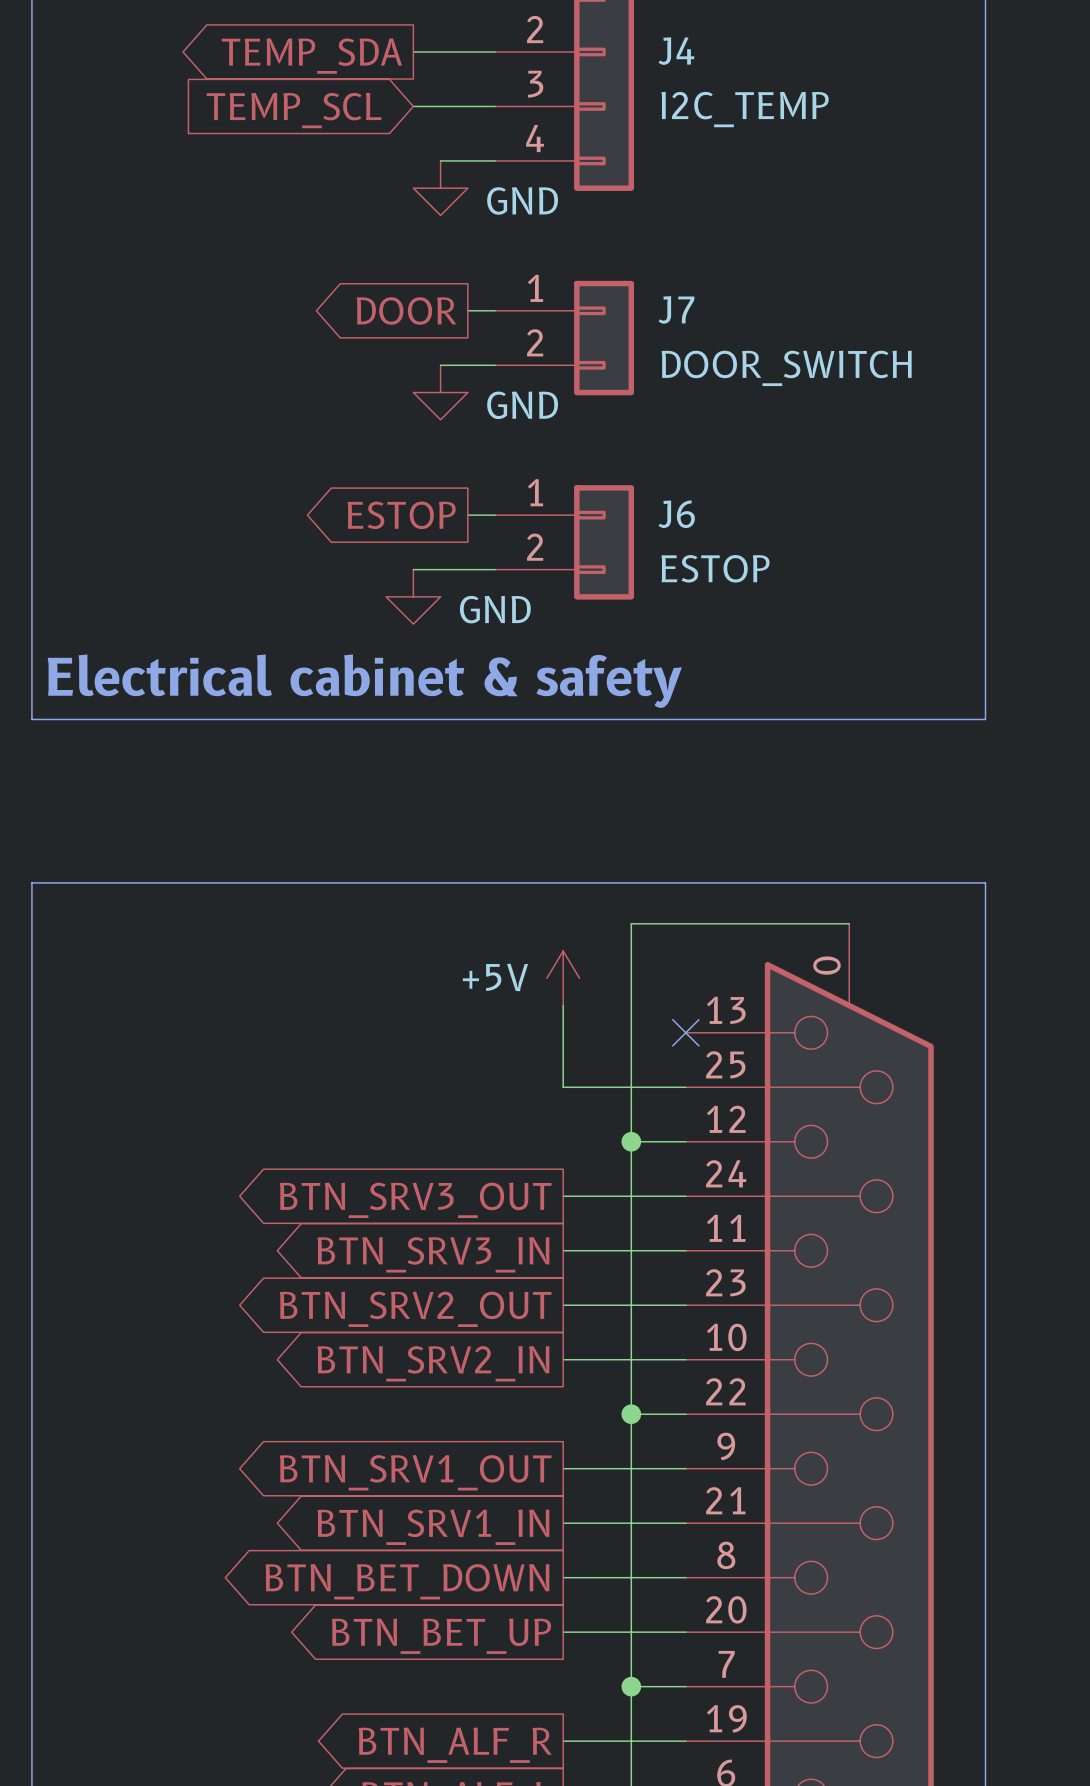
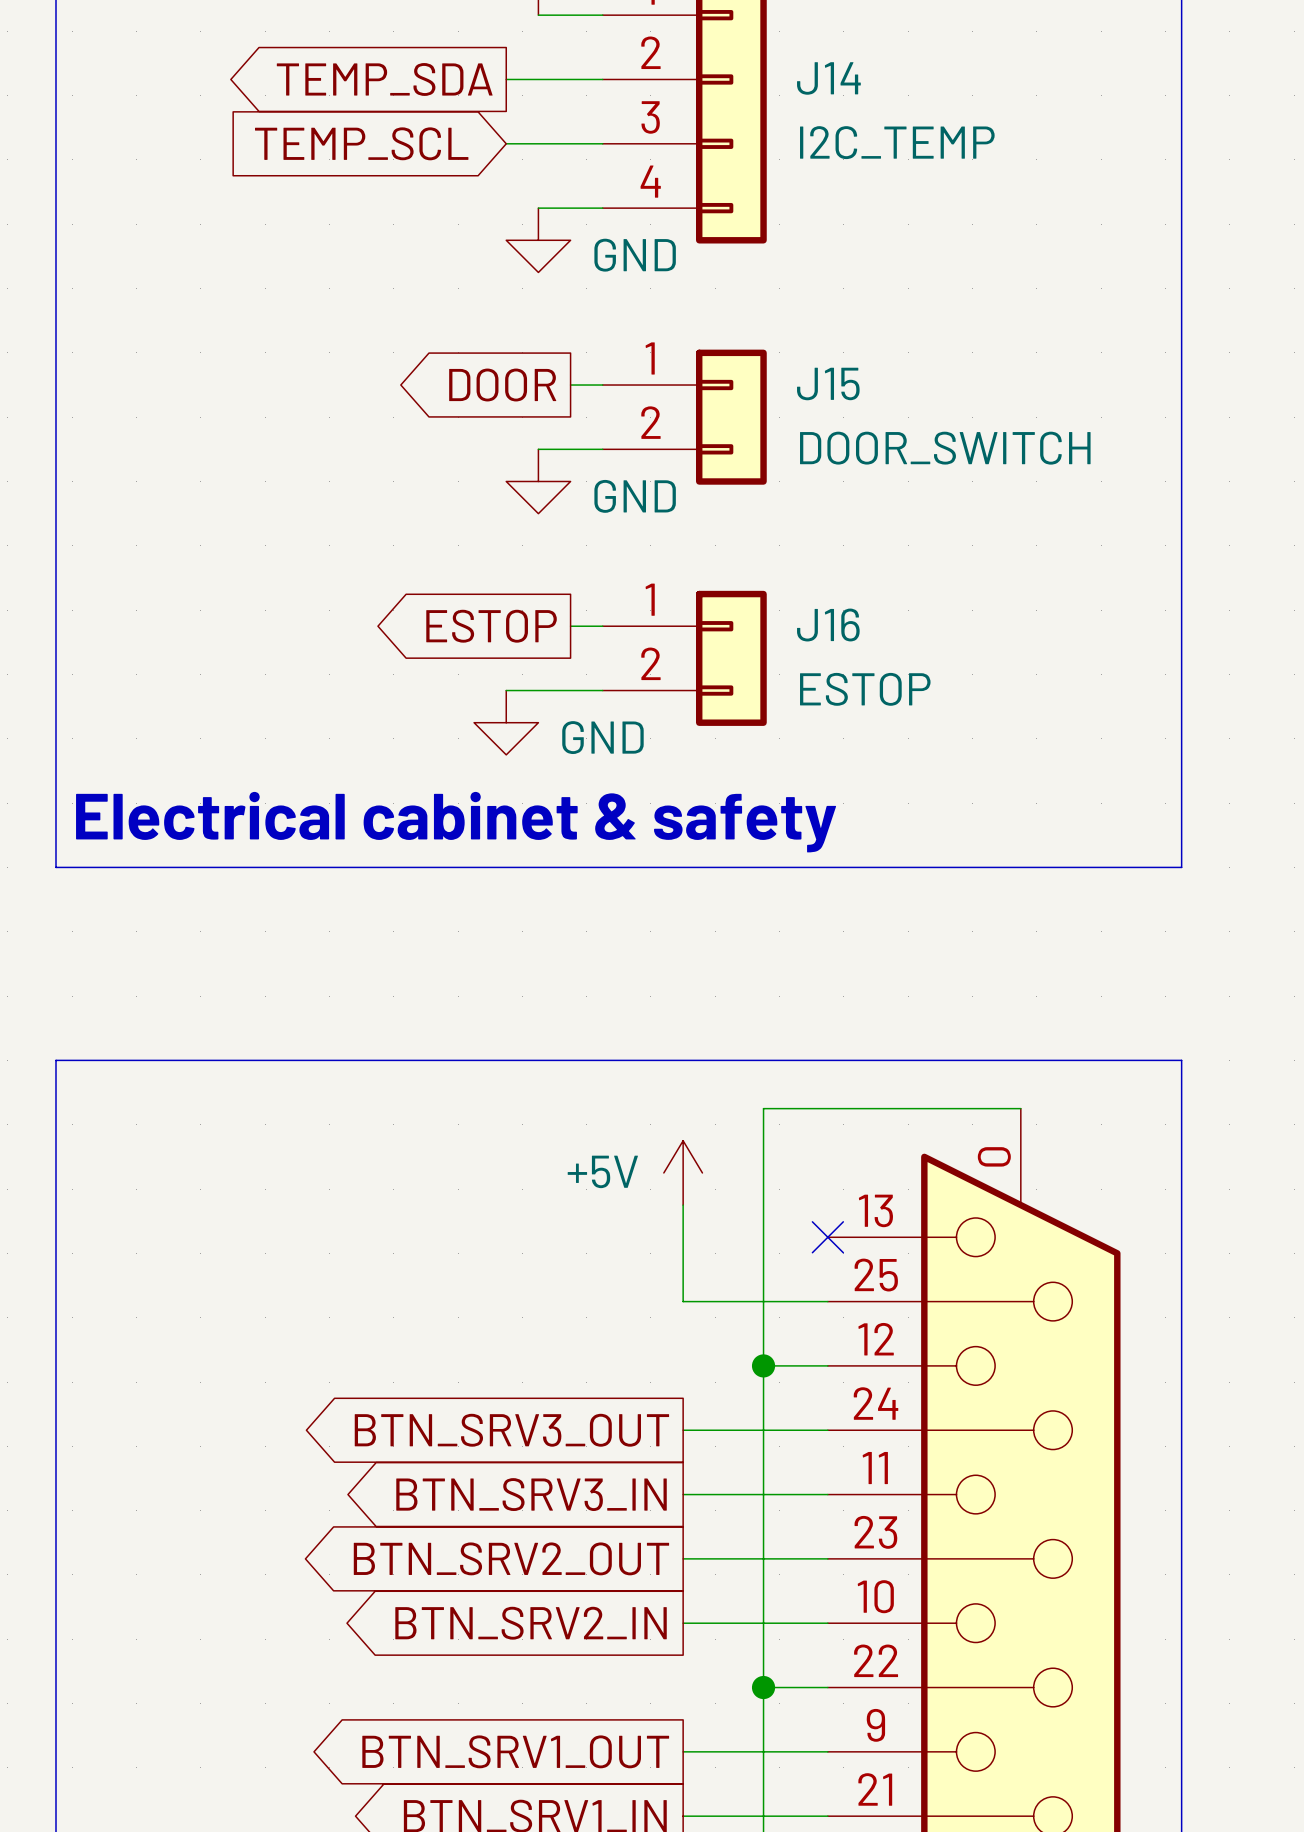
J4 name: J4 (676, 51) -> J14 (828, 78)
J7 name: J7 (676, 309) -> J15 (828, 383)
J6 name: J6 (676, 514) -> J16 (828, 625)

